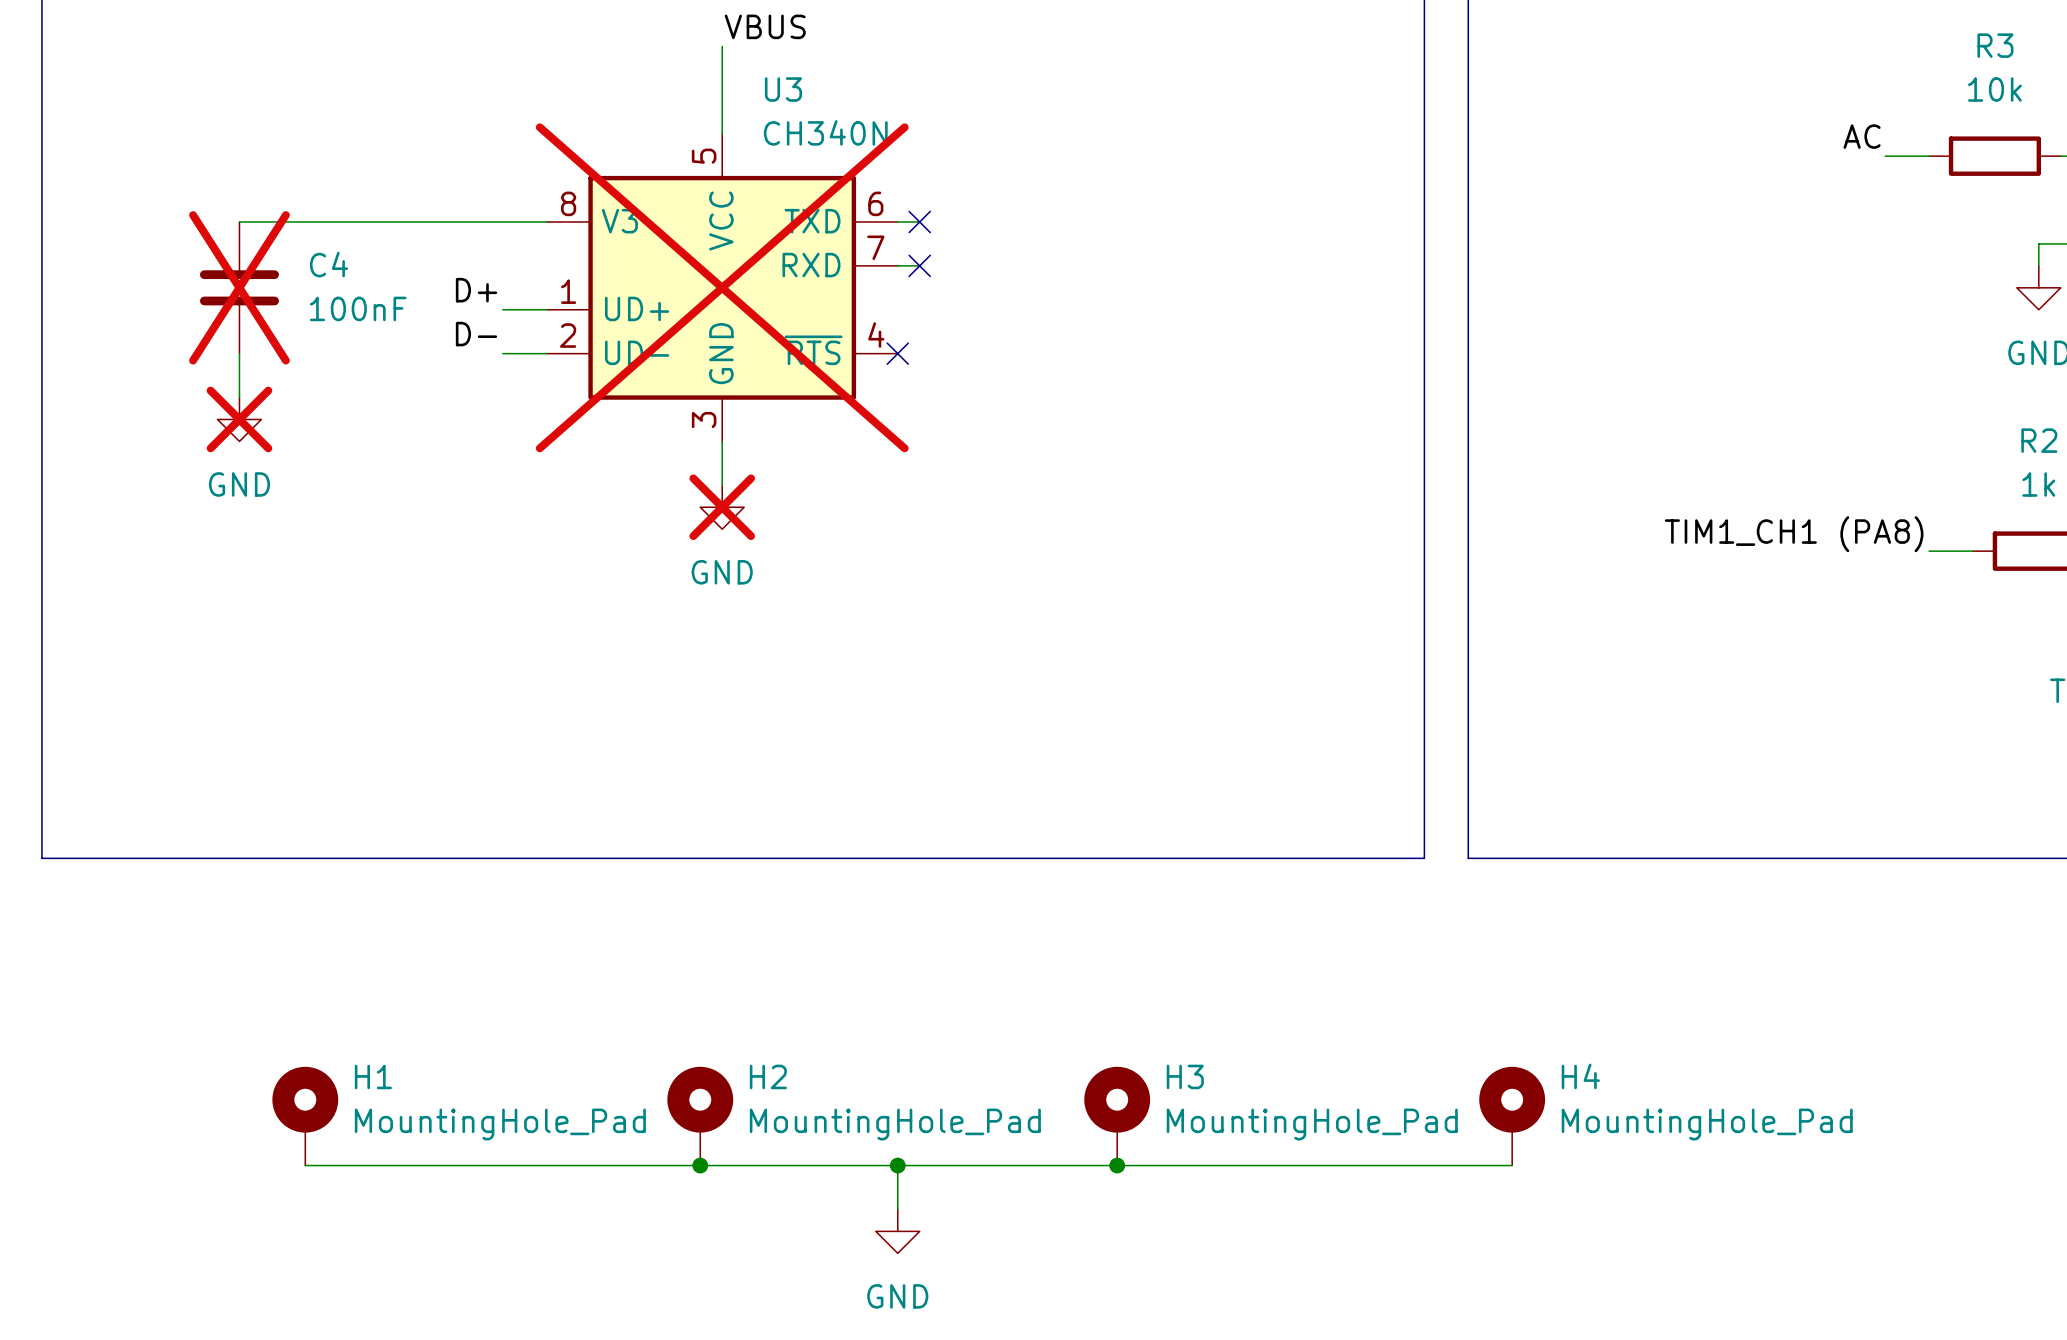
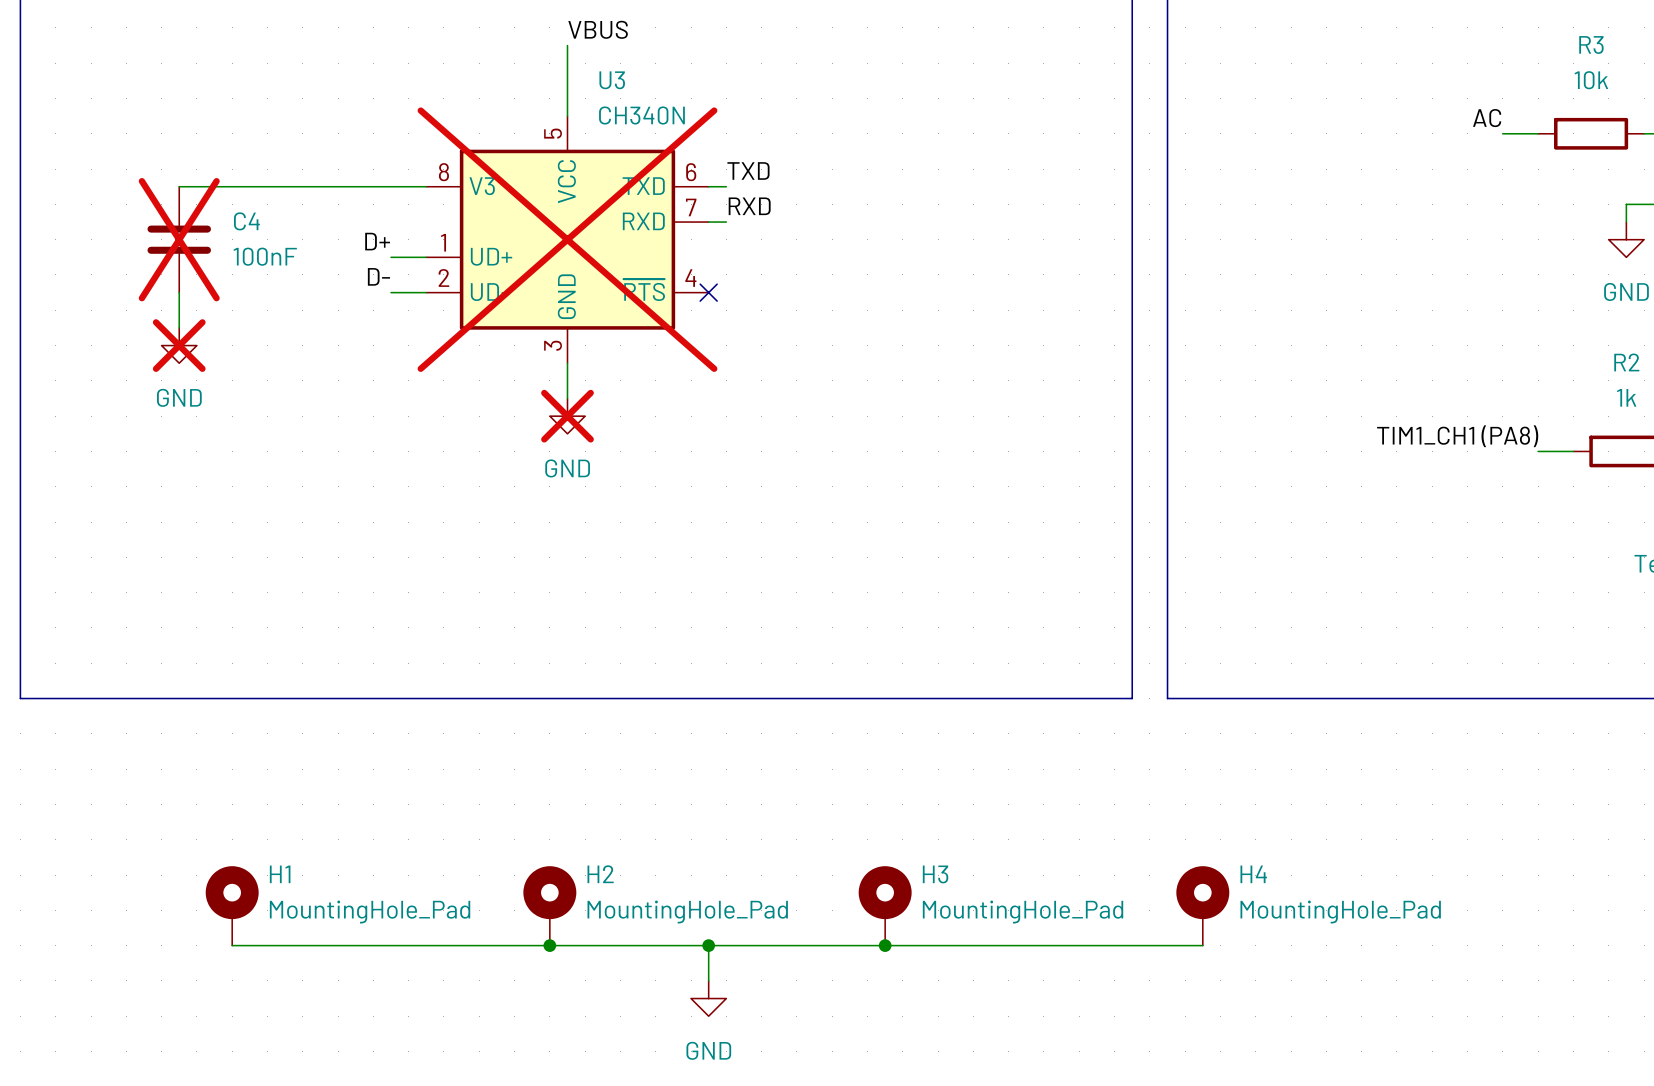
label: none -> TXD (748, 170)
no-connect mark: (919, 221) -> none
label: none -> RXD (749, 206)
no-connect mark: (919, 265) -> none

